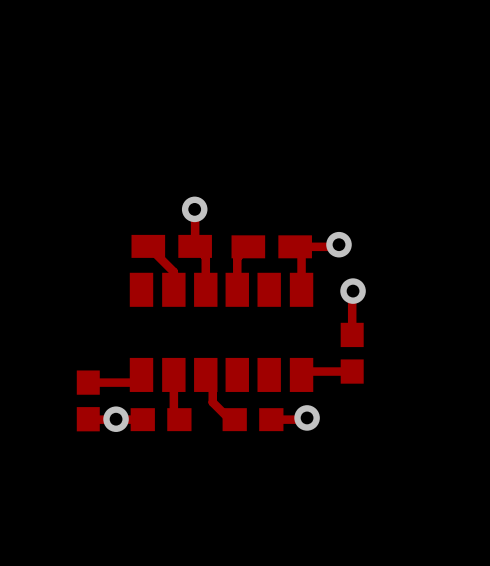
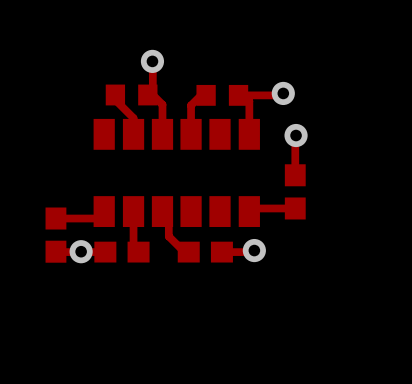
part footprint: [131, 234, 212, 258] -> [105, 84, 158, 106]
part footprint: [231, 235, 312, 259] -> [196, 84, 249, 106]

